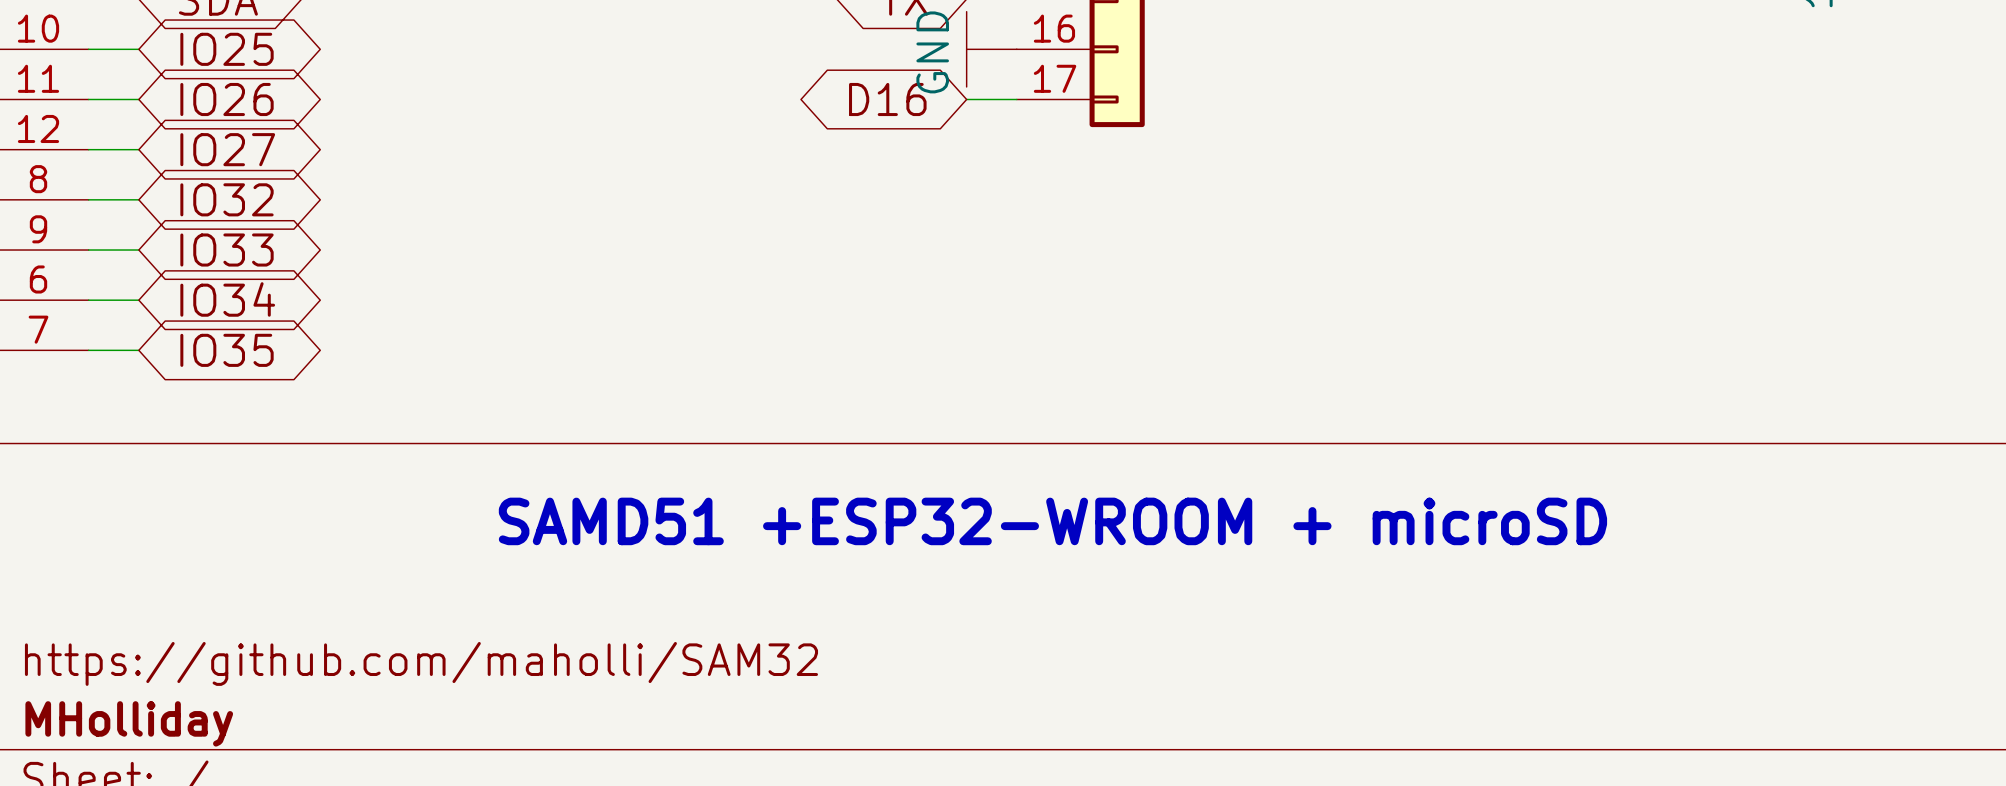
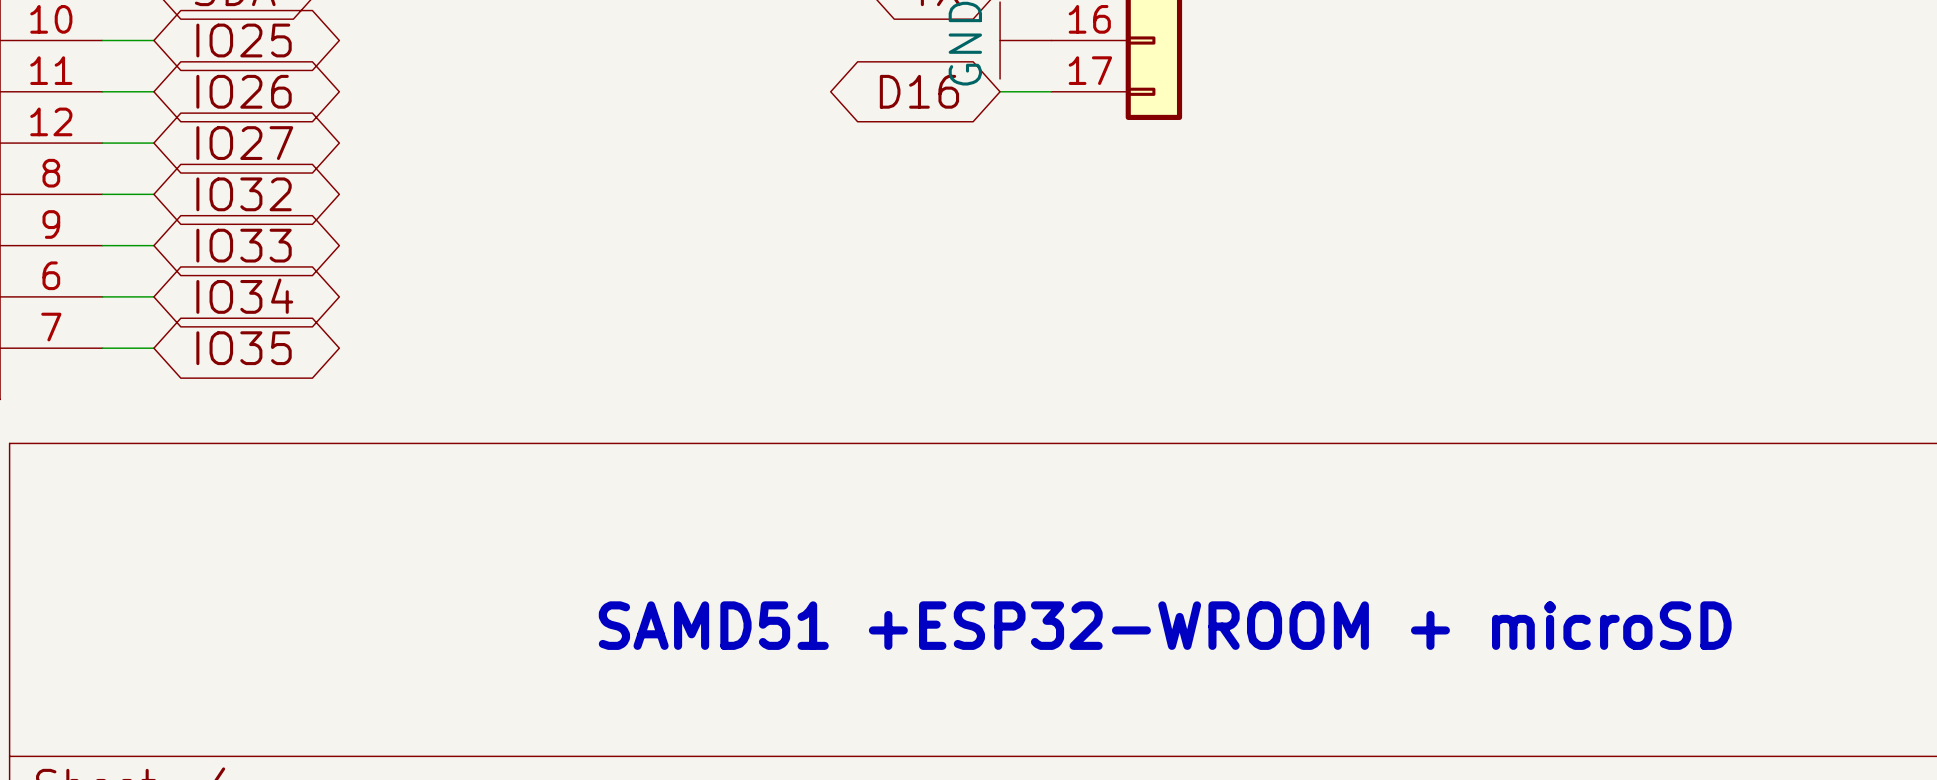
text position: SAMD51 +ESP32-WROOM + microSD (1052, 521) -> SAMD51 +ESP32-WROOM + microSD (1165, 625)
title block: https://github.com/maholli/SAM32 (421, 663) -> none
title block: MHolliday (129, 723) -> none

